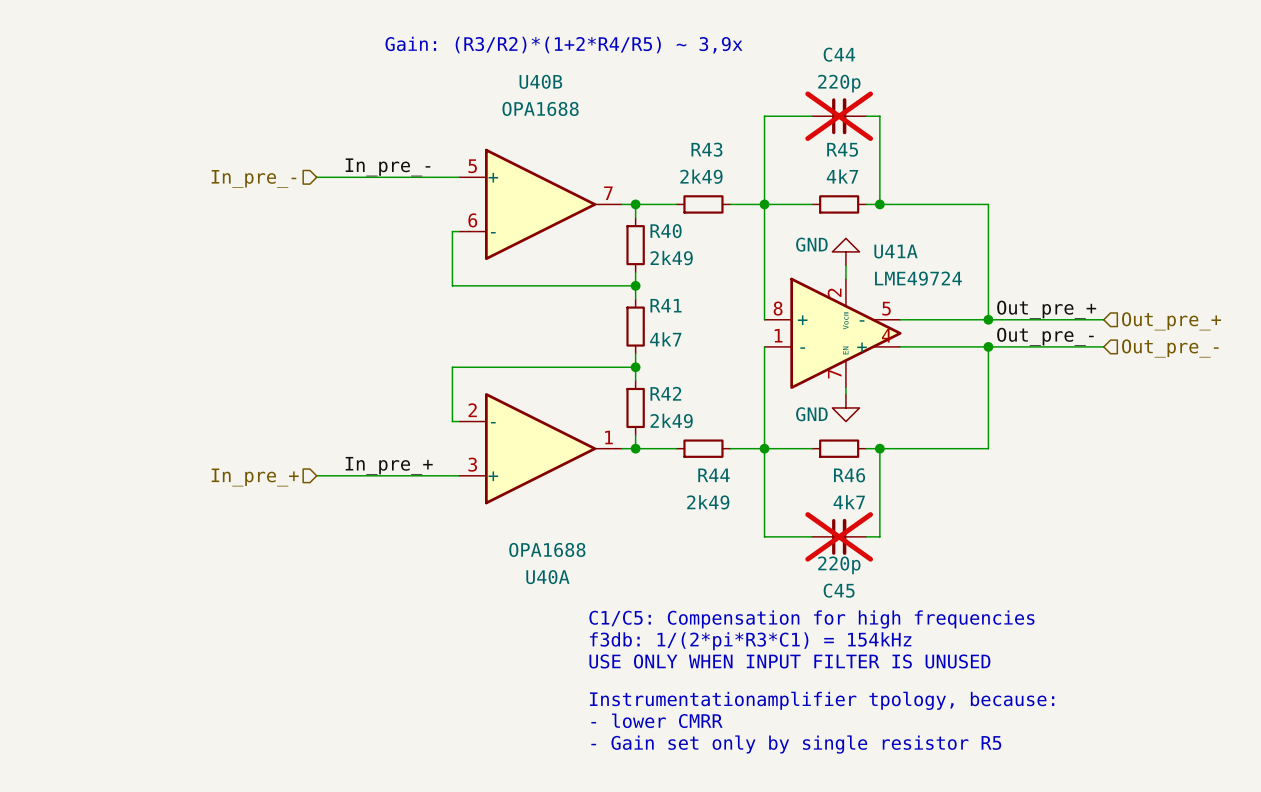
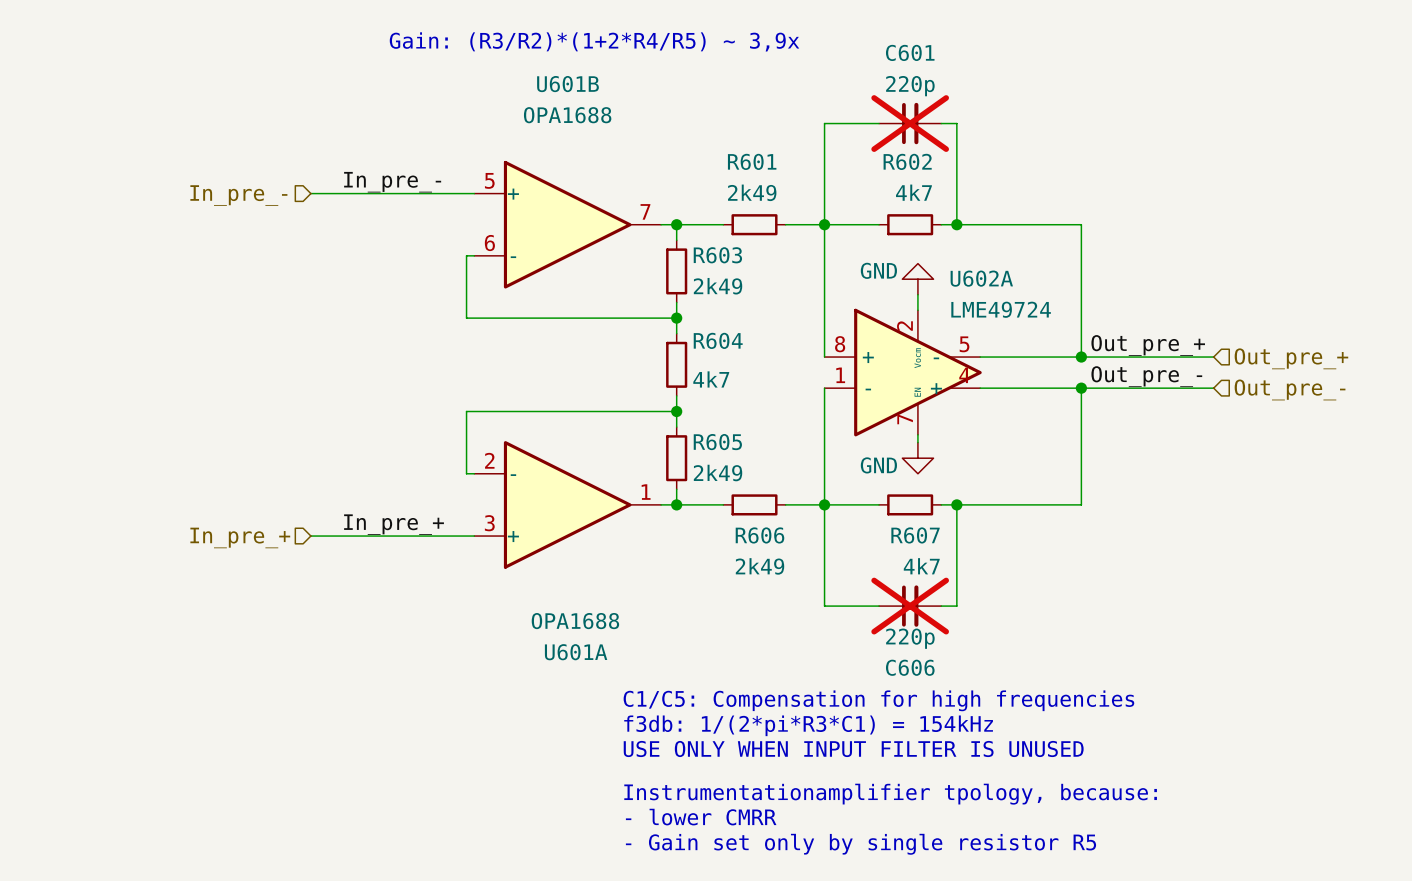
C44 name: C44 (839, 54) -> C601 (910, 52)
U40B name: U40B (540, 81) -> U601B (567, 84)
R43 name: R43 (706, 149) -> R601 (752, 161)
R45 name: R45 (842, 149) -> R602 (907, 161)
R40 name: R40 (666, 231) -> R603 (717, 255)
U41A name: U41A (895, 251) -> U602A (981, 278)
R41 name: R41 (666, 305) -> R604 (718, 340)
R42 name: R42 (665, 393) -> R605 (717, 442)
R44 name: R44 (714, 475) -> R606 (759, 535)
R46 name: R46 (849, 475) -> R607 (915, 535)
U40A name: U40A (547, 577) -> U601A (576, 652)
C45 name: C45 (839, 590) -> C606 (910, 667)

